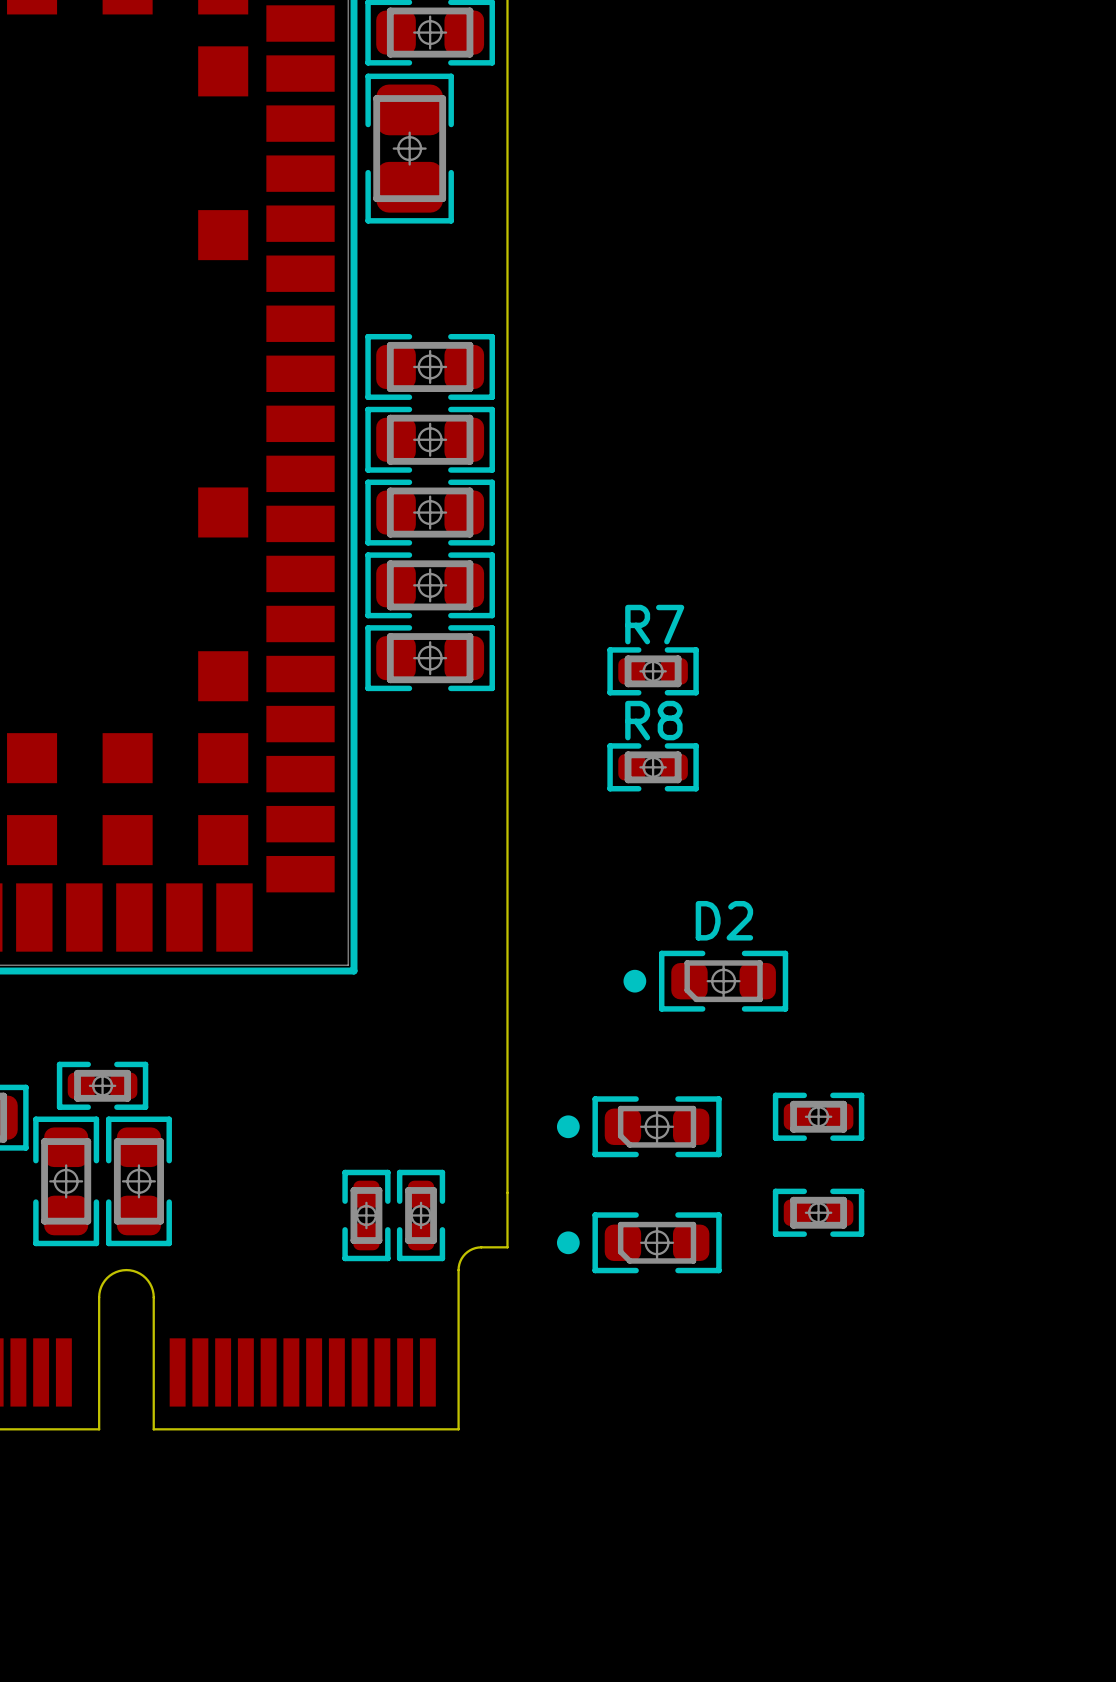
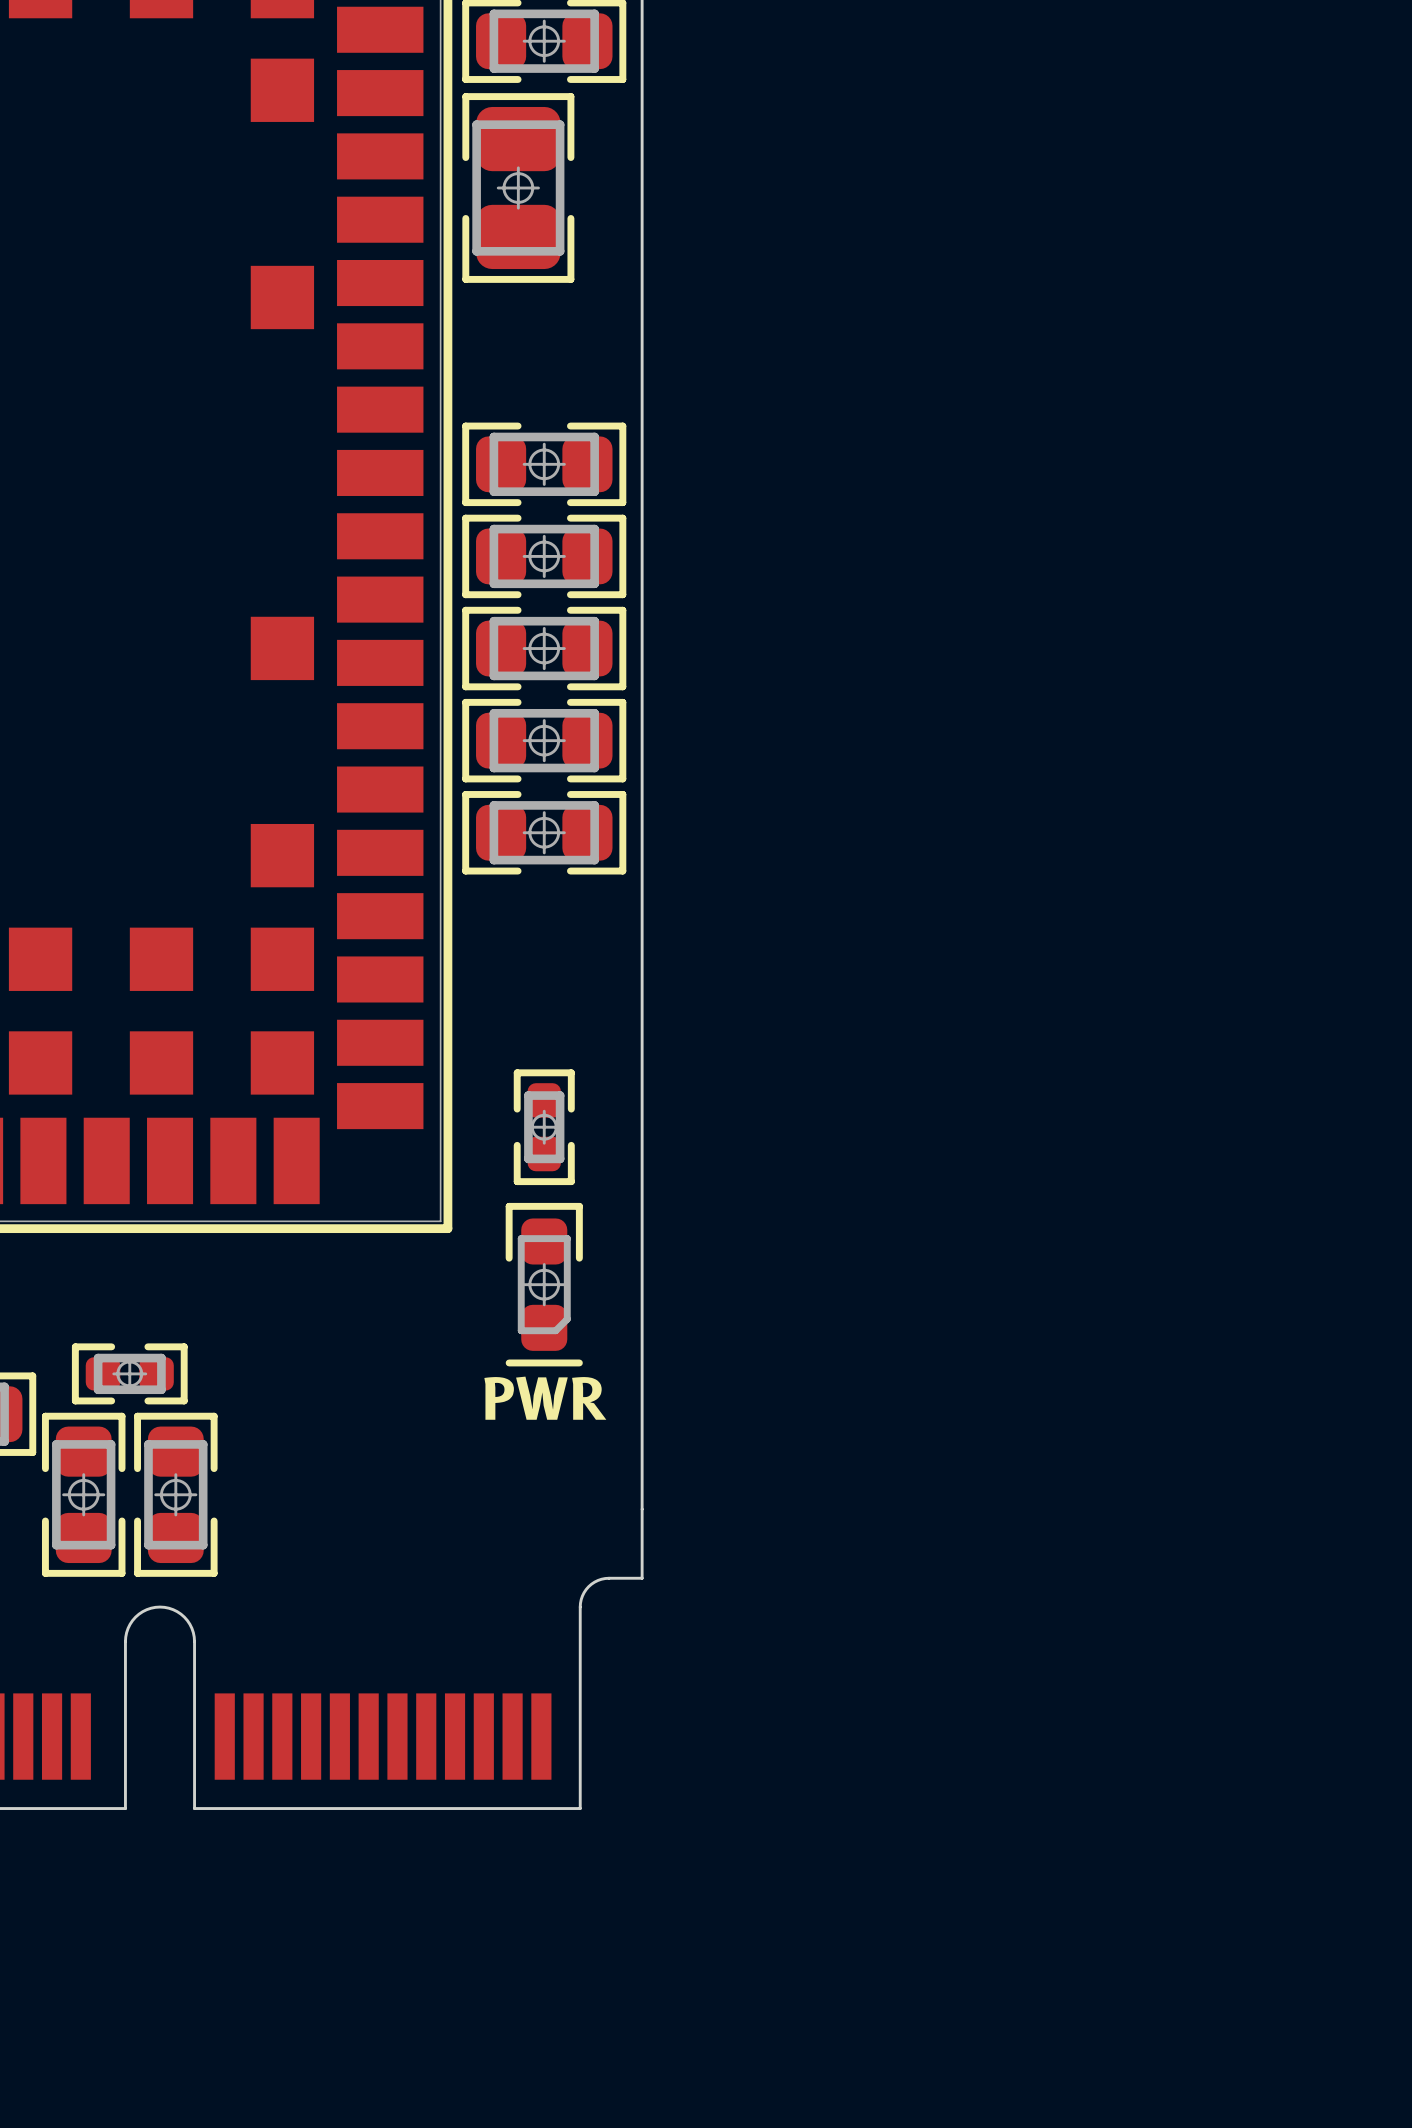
R7: (653, 671) -> none
R8: (653, 767) -> none
part: none -> (544, 1127)
D2: (705, 981) -> none
part: none -> (544, 1284)
text: none -> PWR (545, 1398)
part: (818, 1116) -> none
part: (639, 1126) -> none
part: (818, 1212) -> none
part: (366, 1215) -> none
part: (421, 1215) -> none
part: (639, 1242) -> none

